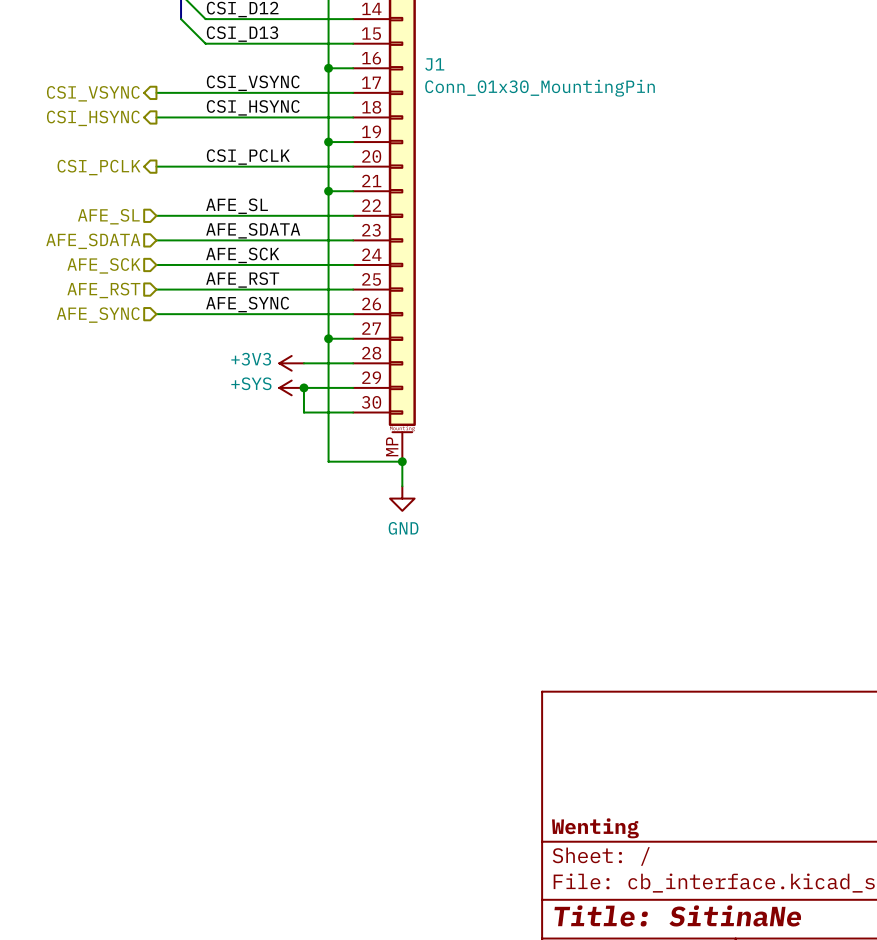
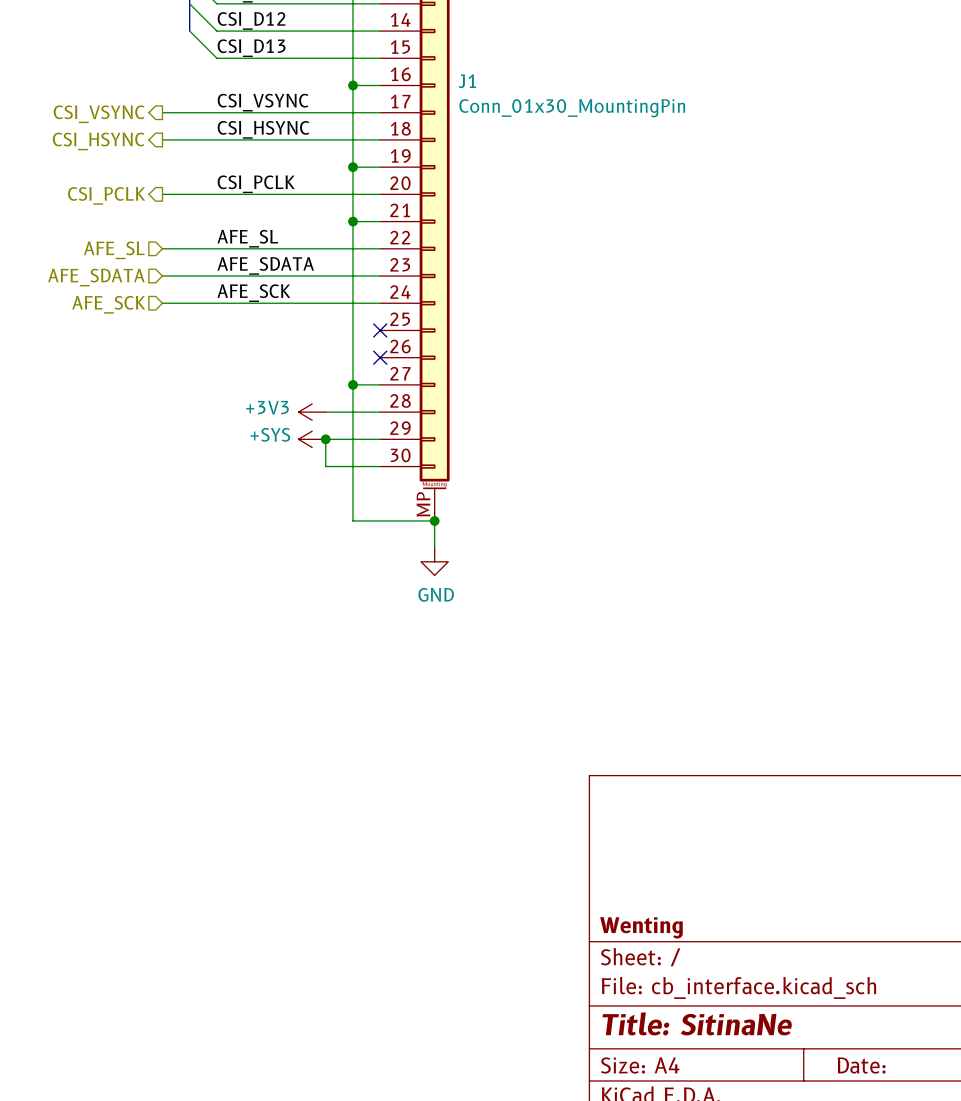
label: AFE_RST (242, 279) -> none
wire: (156, 289) (353, 289) -> none
no-connect mark: none -> (380, 330)
hierarchical label: AFE_RST (103, 290) -> none
label: AFE_SYNC (247, 304) -> none
wire: (156, 314) (353, 314) -> none
no-connect mark: none -> (380, 357)
hierarchical label: AFE_SYNC (98, 315) -> none

